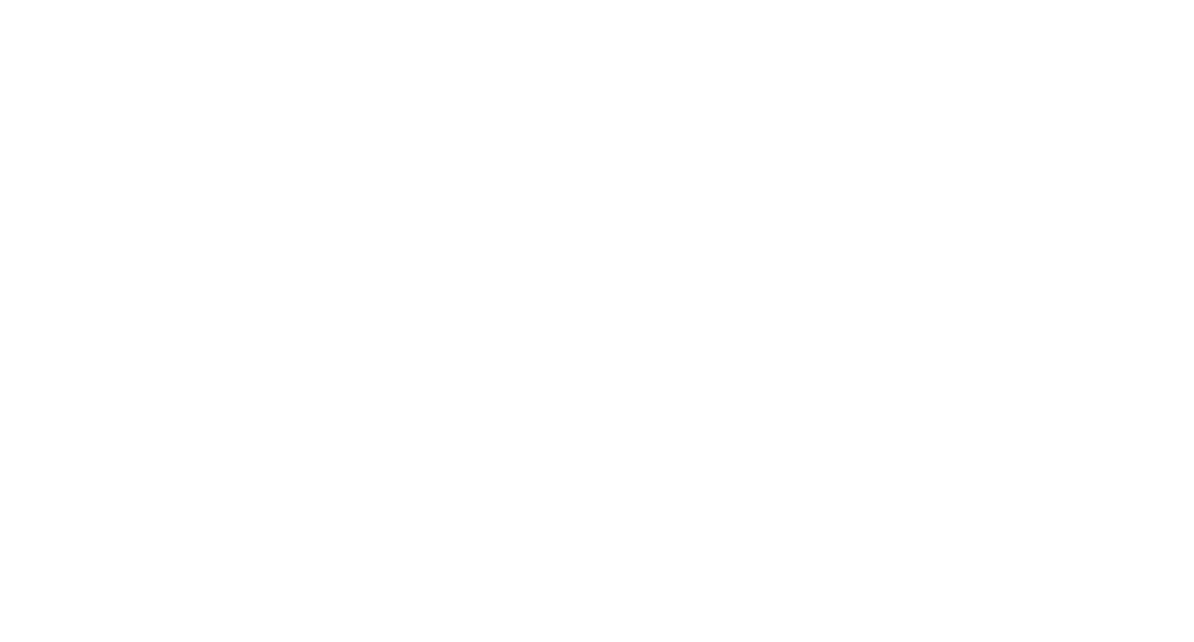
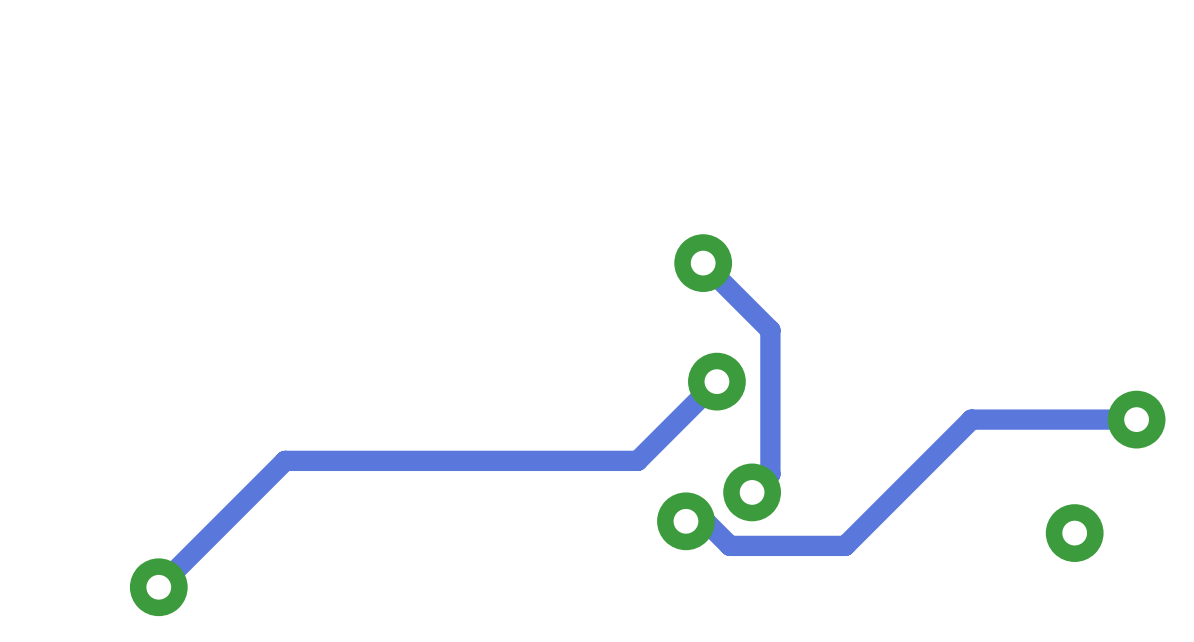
track: none -> (703, 263) (770, 330) (770, 474) (752, 492)
via: none -> (703, 263)
track: none -> (716, 381) (637, 460) (285, 460) (158, 587)
via: none -> (716, 381)
track: none -> (1136, 419) (971, 419) (845, 545) (729, 545) (705, 521) (685, 521)
via: none -> (1136, 419)
via: none -> (752, 492)
via: none -> (685, 521)
via: none -> (1074, 533)
via: none -> (158, 587)

